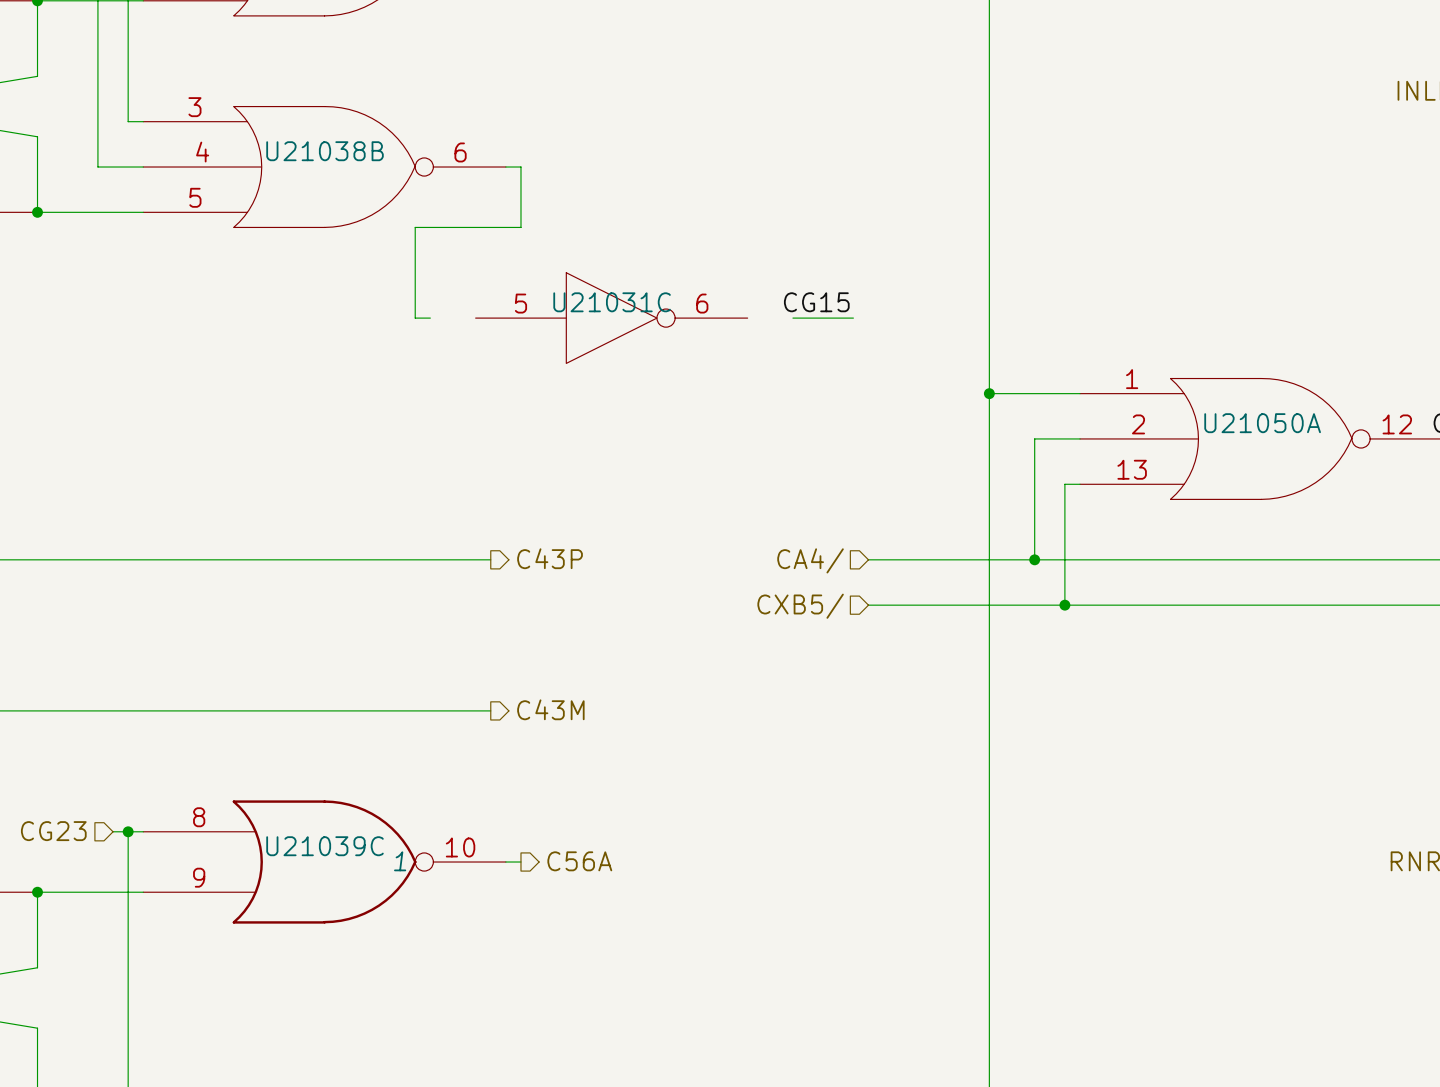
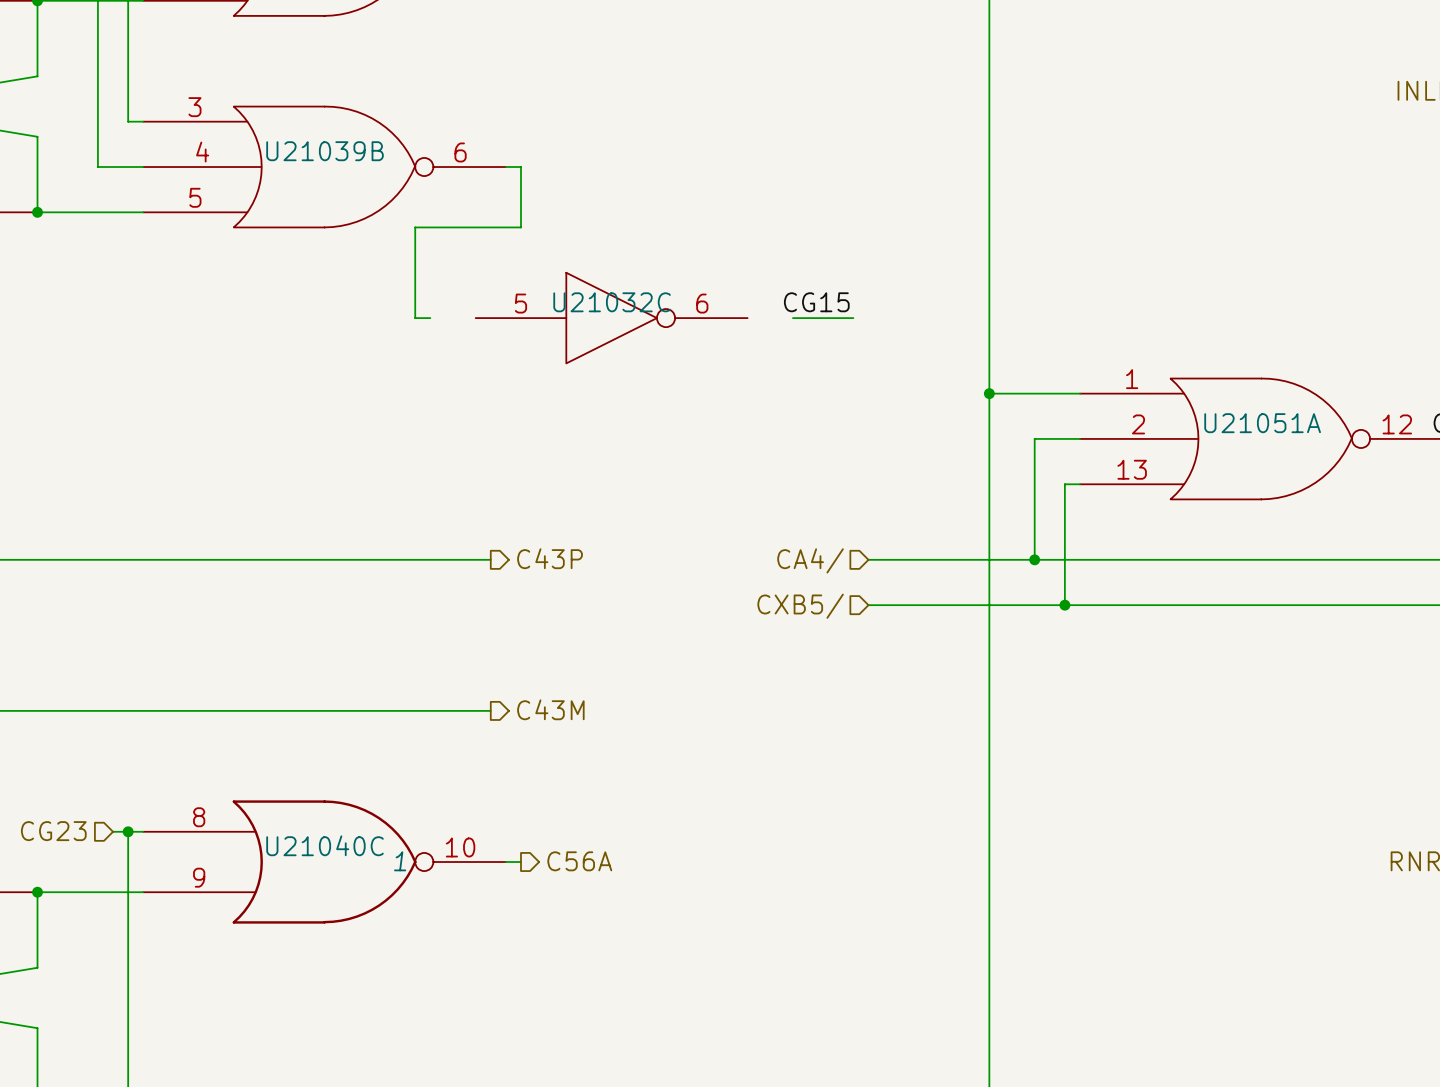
U21038B name: U21038B (325, 151) -> U21039B (325, 151)
U21031C name: U21031C (612, 302) -> U21032C (612, 302)
U21050A name: U21050A (1262, 423) -> U21051A (1262, 423)
U21039C name: U21039C (325, 846) -> U21040C (325, 845)

